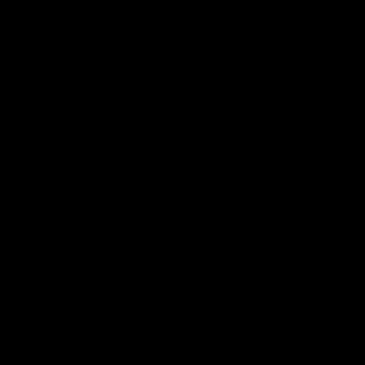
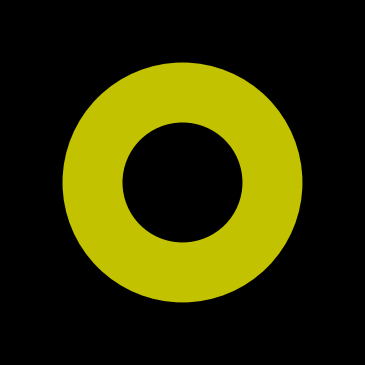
part: none -> (182, 182)

